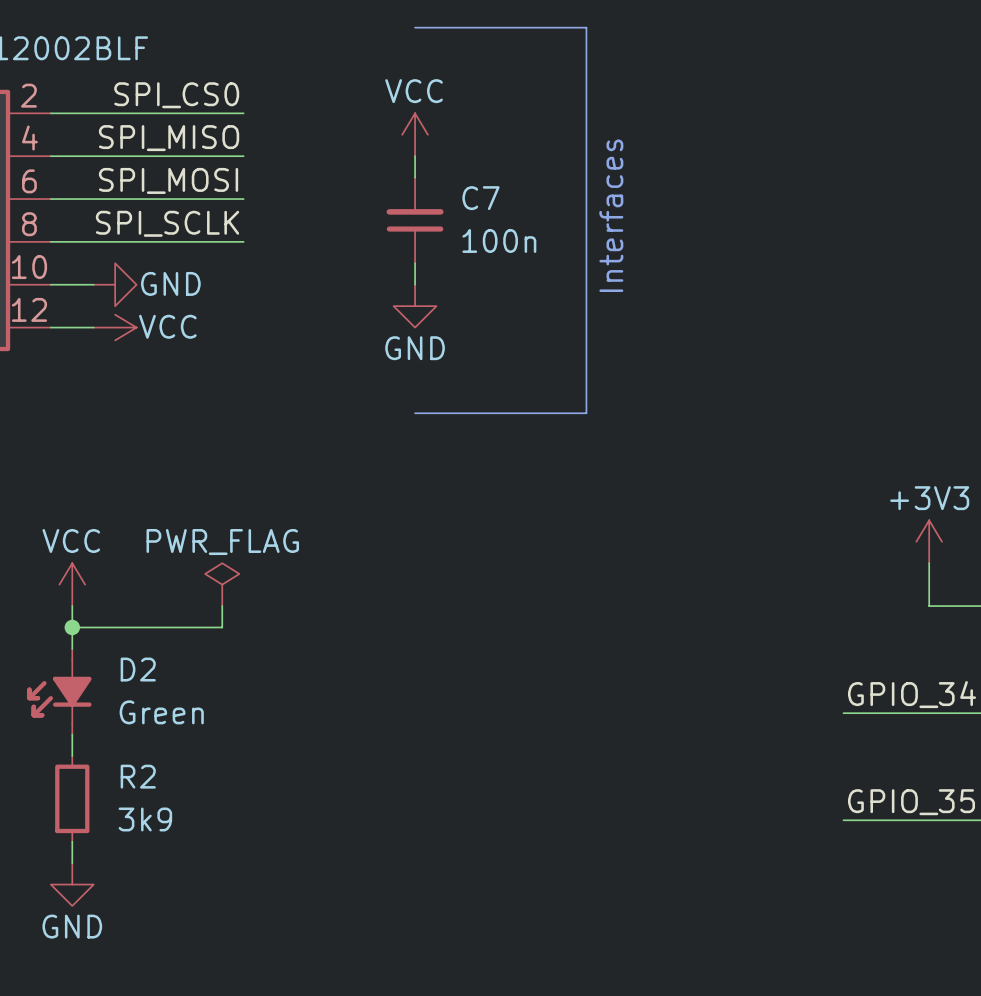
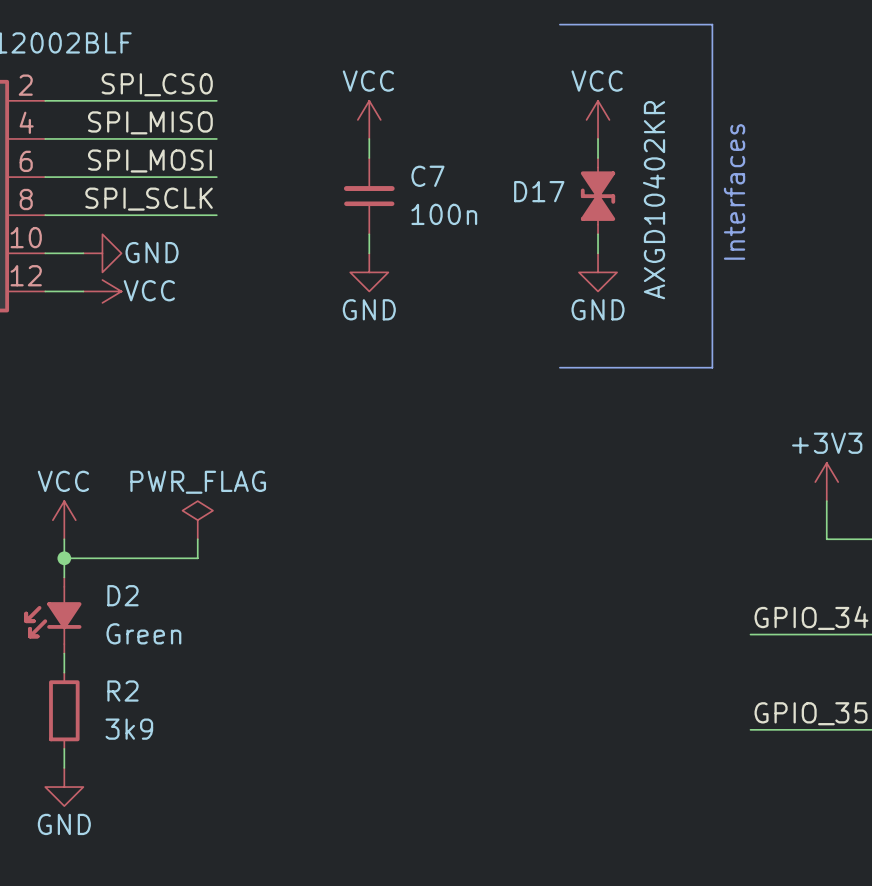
line: (415, 27) (586, 27) (586, 413) (415, 413) -> (559, 24) (712, 24) (712, 367) (559, 367)
power symbol: none -> VCC (598, 119)
wire: none -> (598, 138) (598, 158)
text position: Interfaces (611, 215) -> Interfaces (734, 191)
D17: none -> (598, 196)
wire: none -> (598, 234) (598, 253)
power symbol: none -> GND (598, 272)

